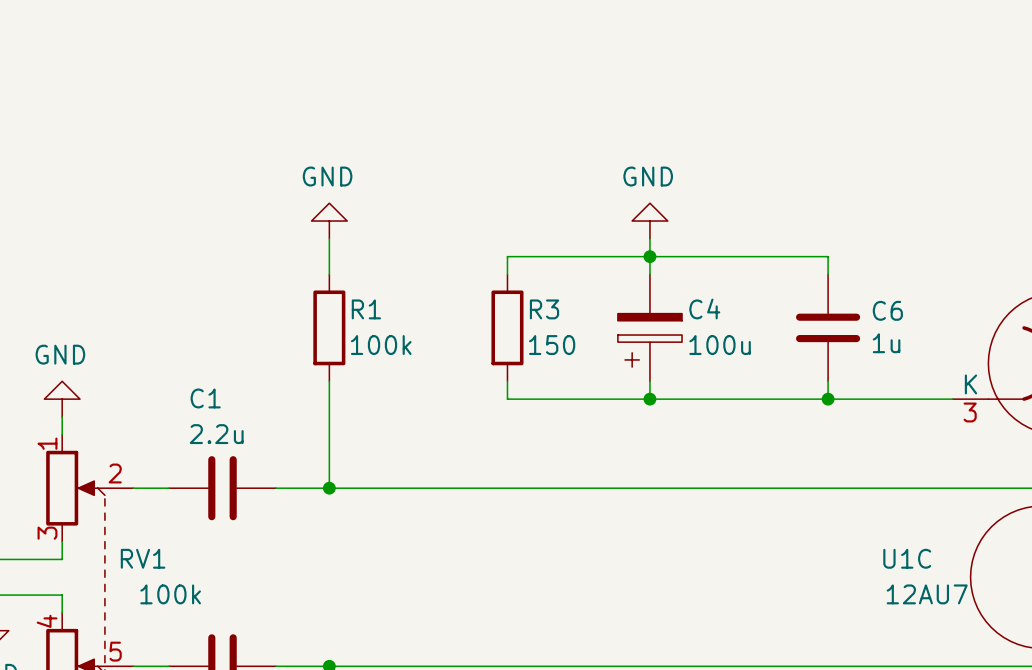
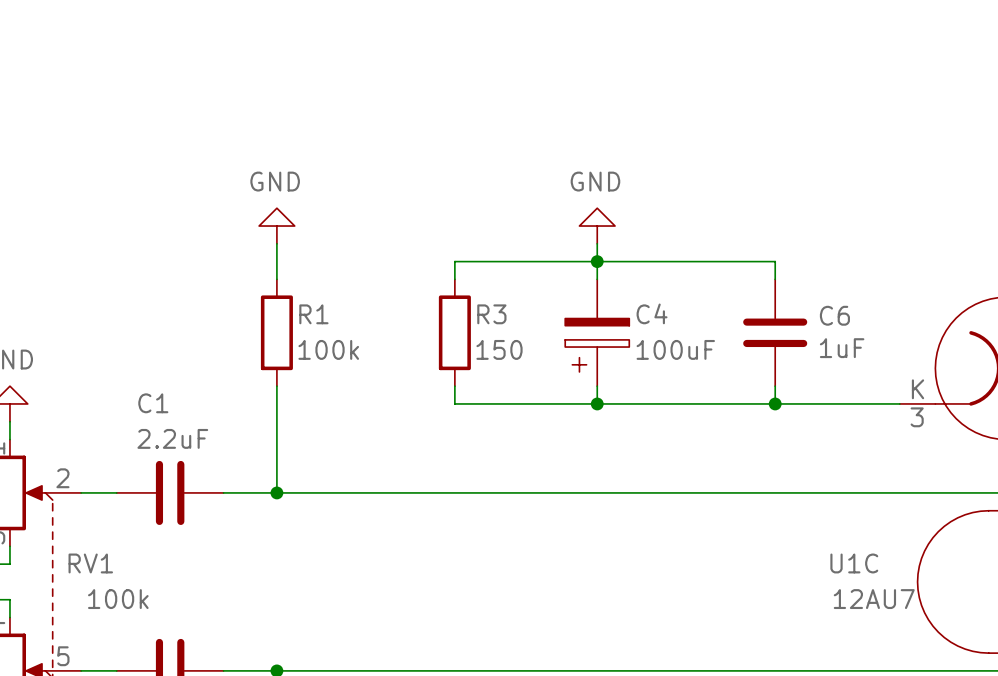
C6 value: 1u (886, 343) -> 1uF (842, 348)
C4 value: 100u (720, 345) -> 100uF (675, 349)
C1 value: 2.2u (216, 434) -> 2.2uF (172, 438)

